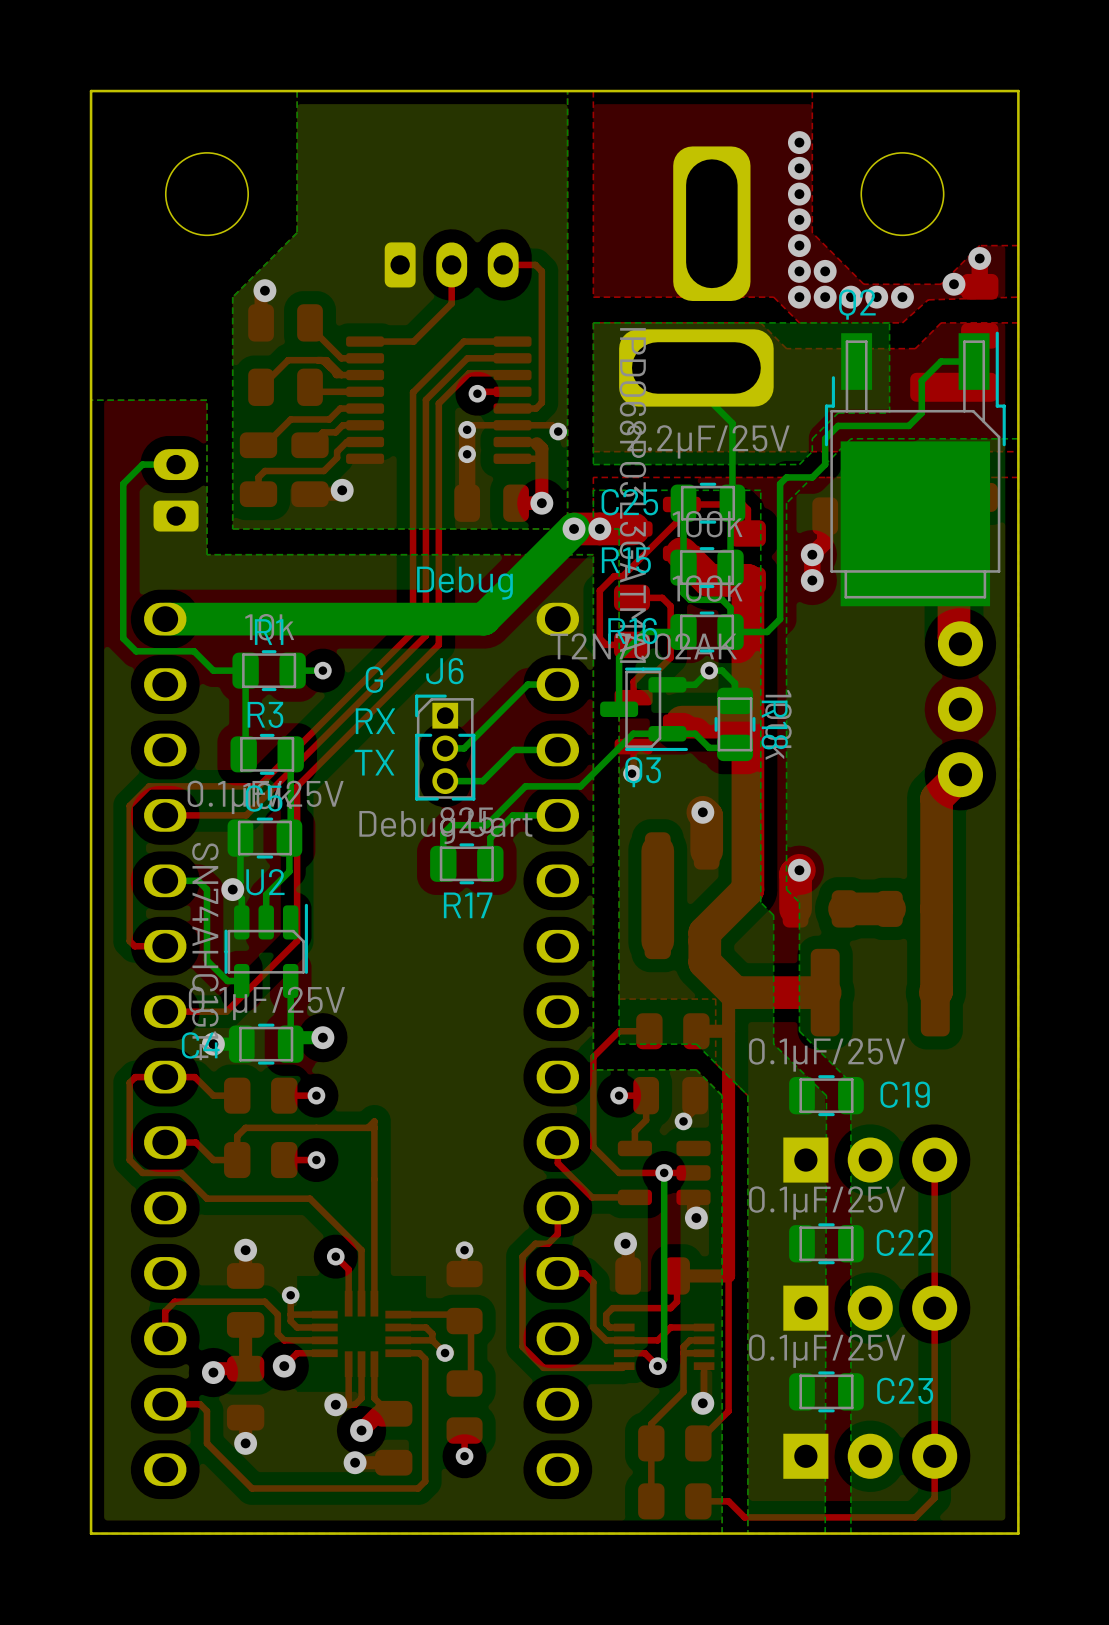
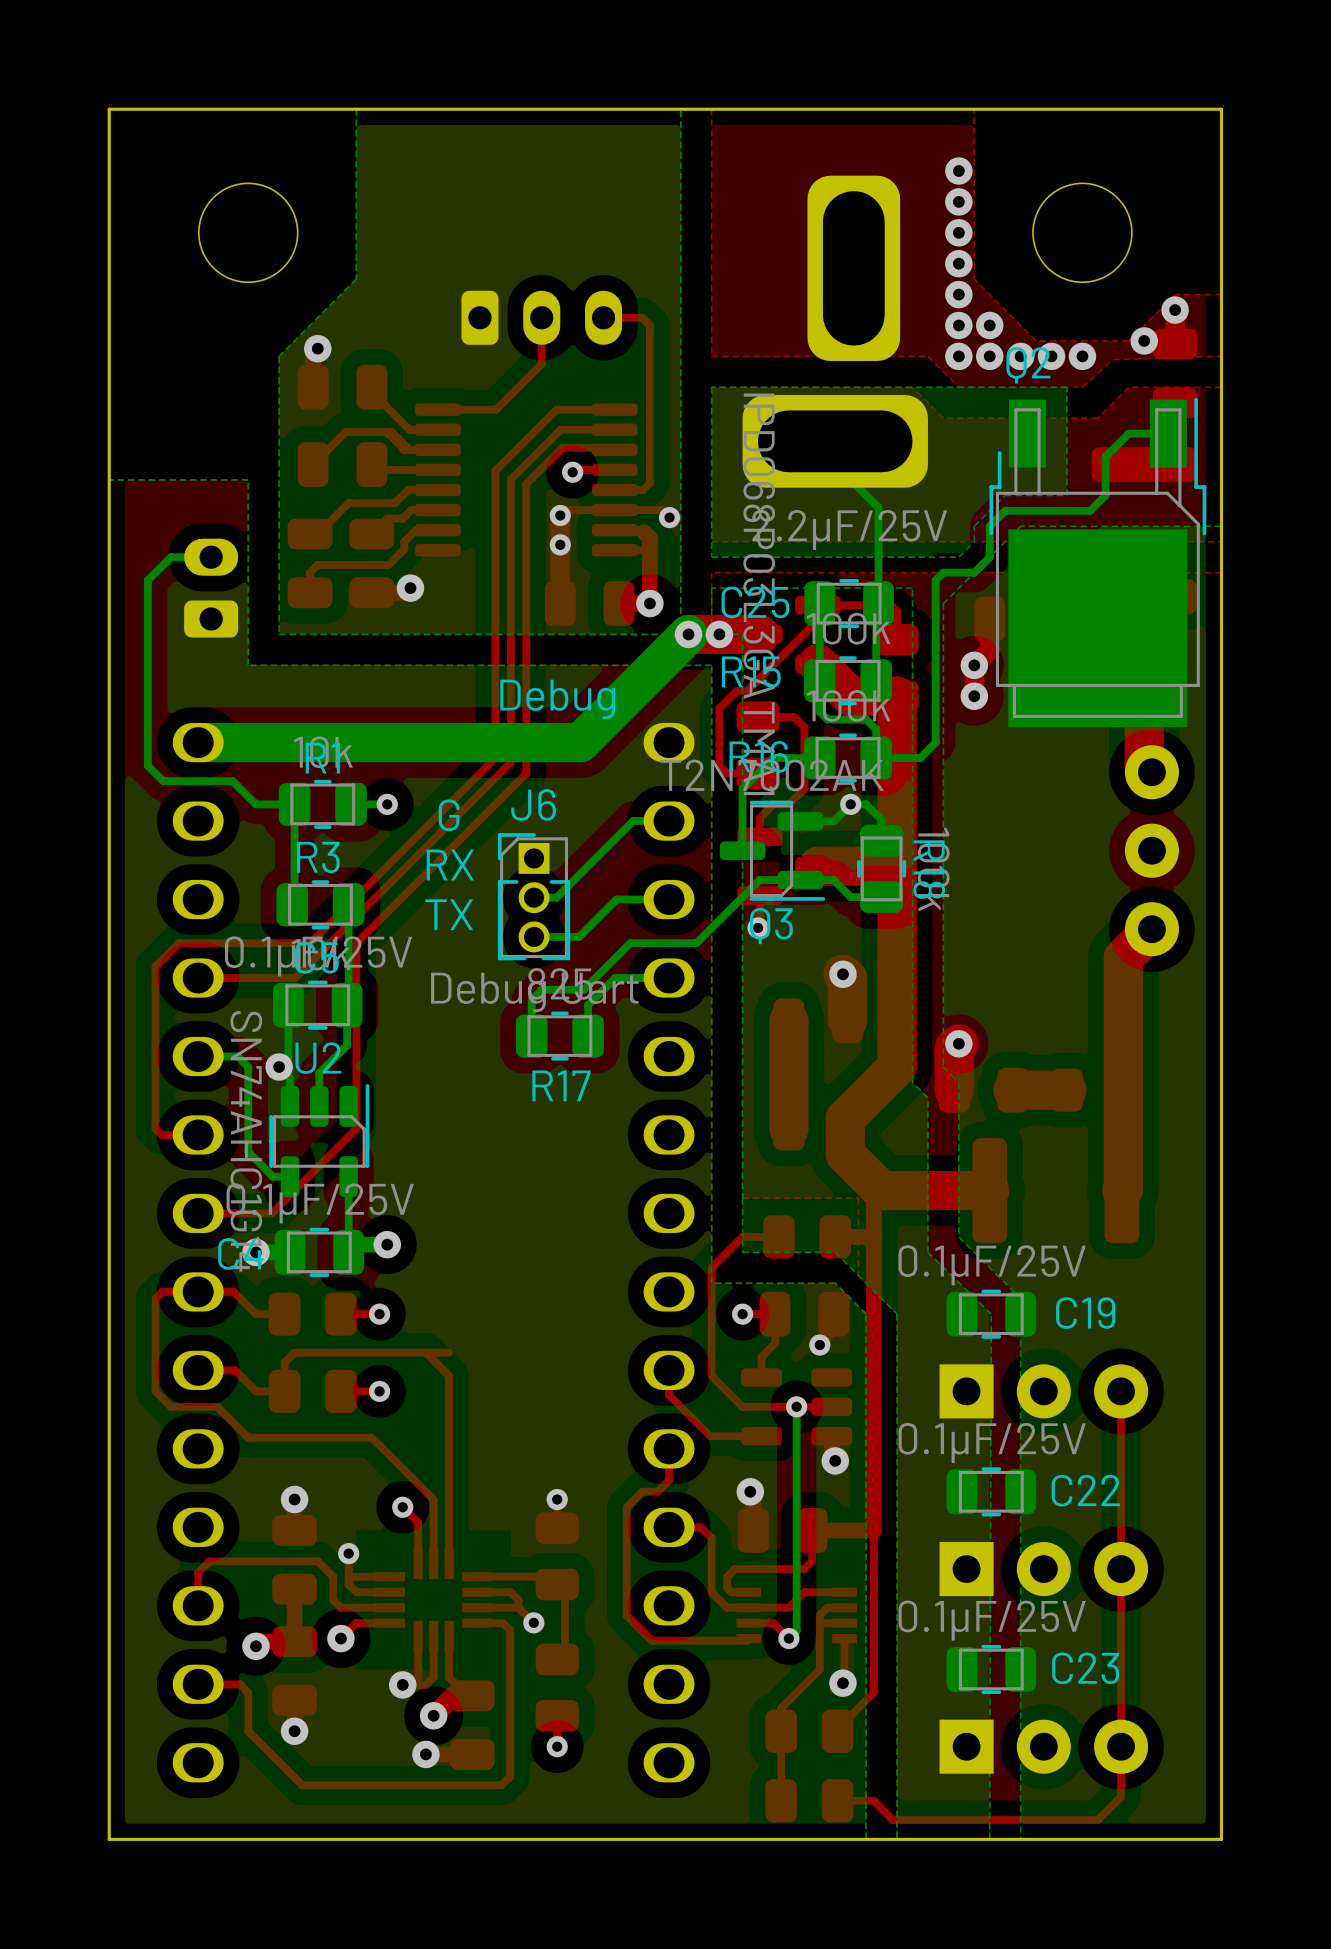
top track: (367, 1127) (374, 1121) (374, 1147) -> (425, 1352) (449, 1375)

